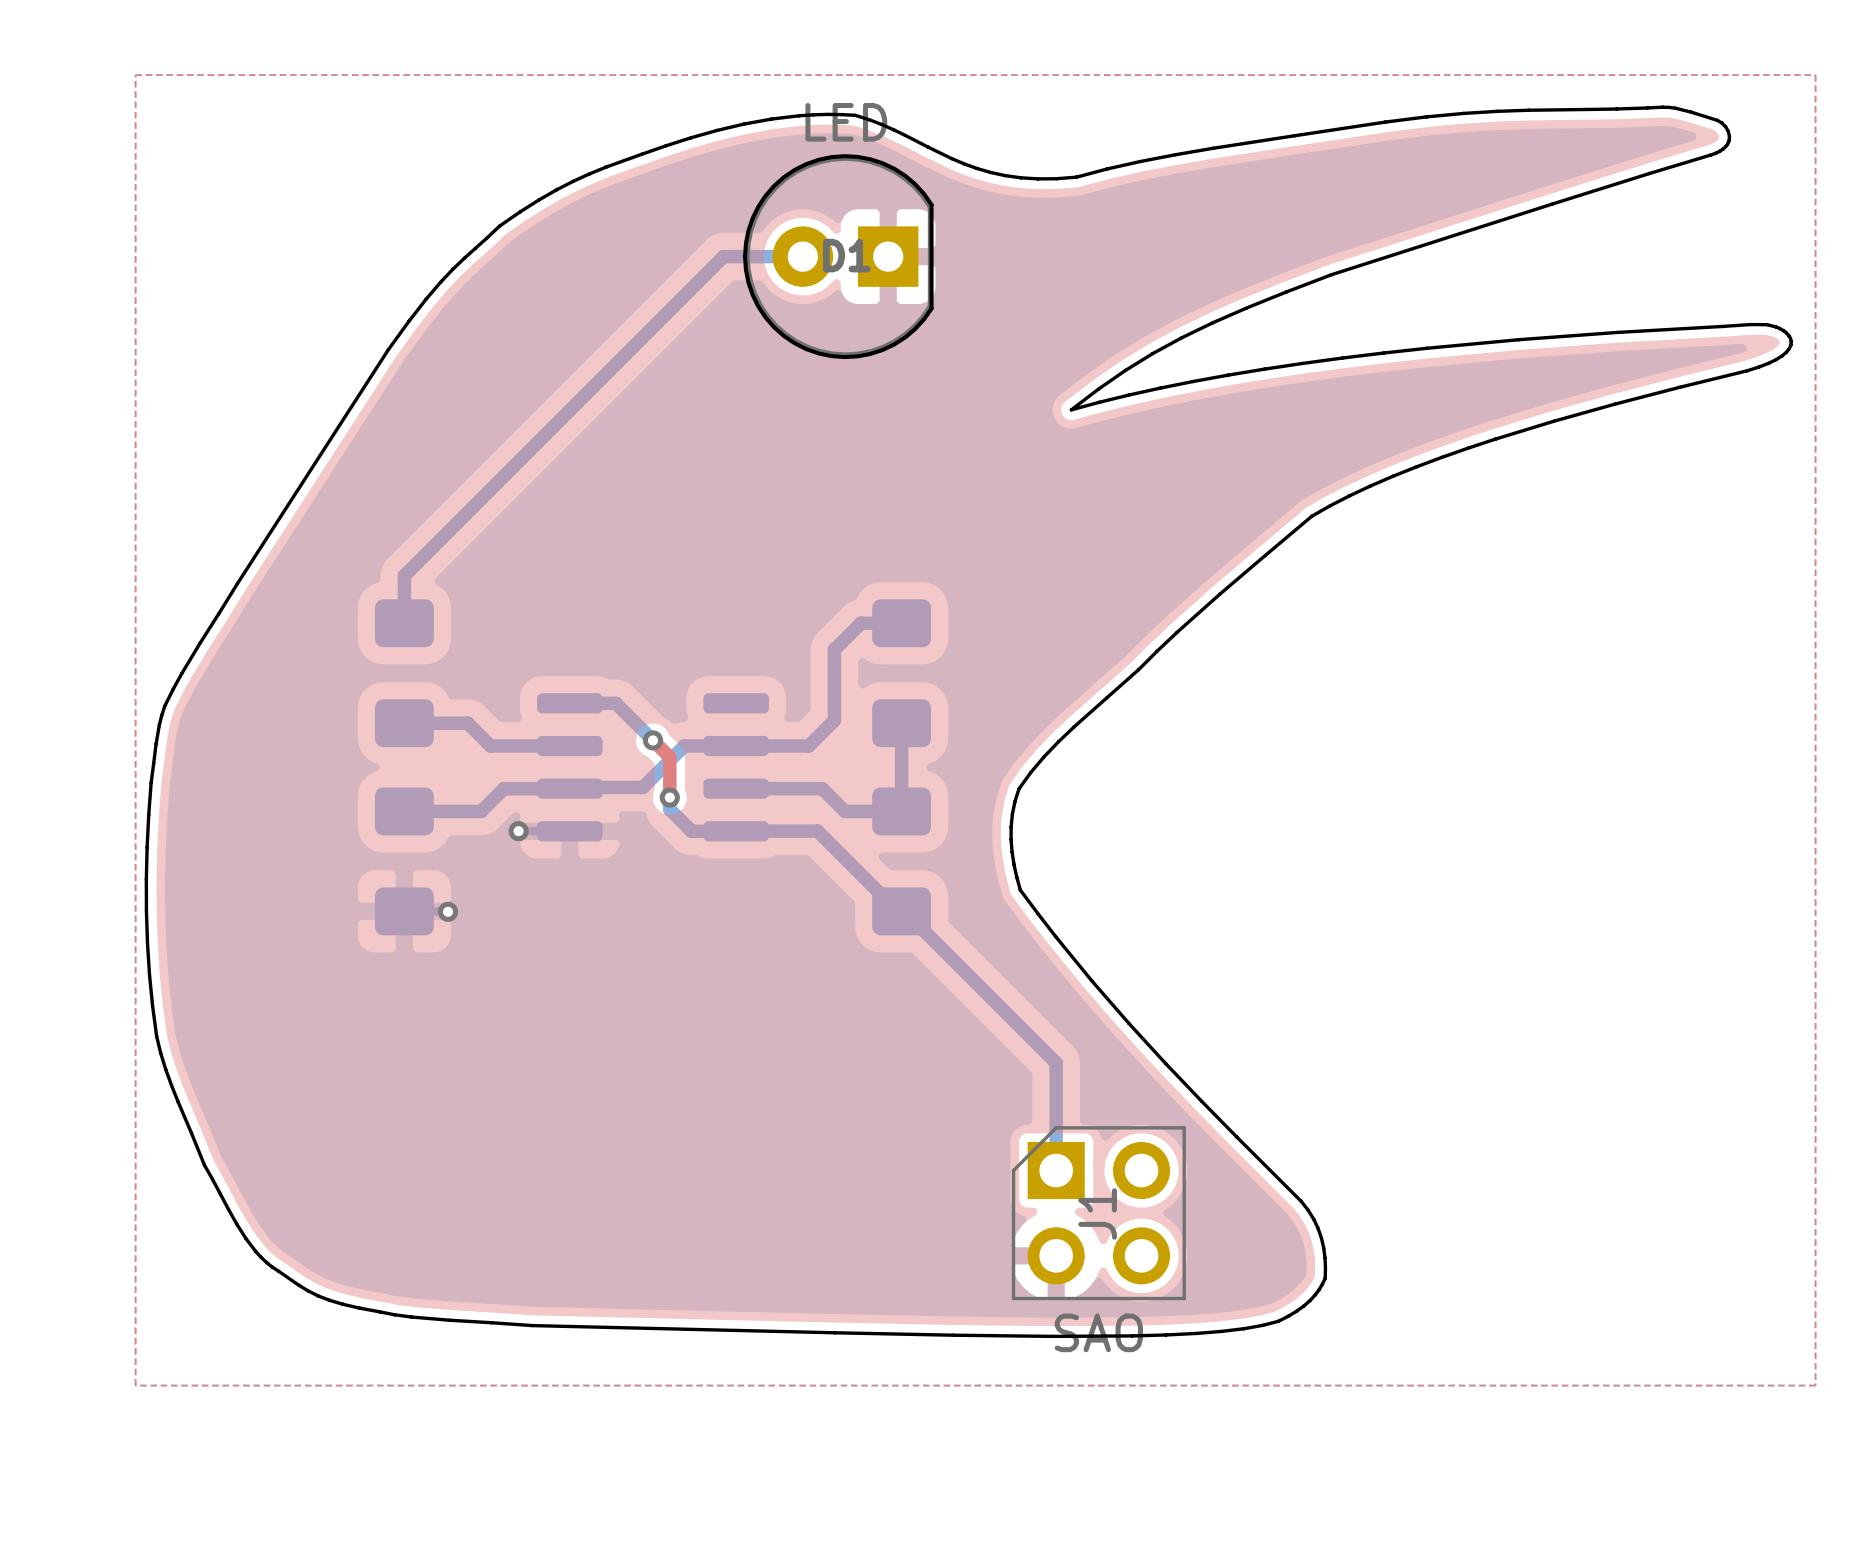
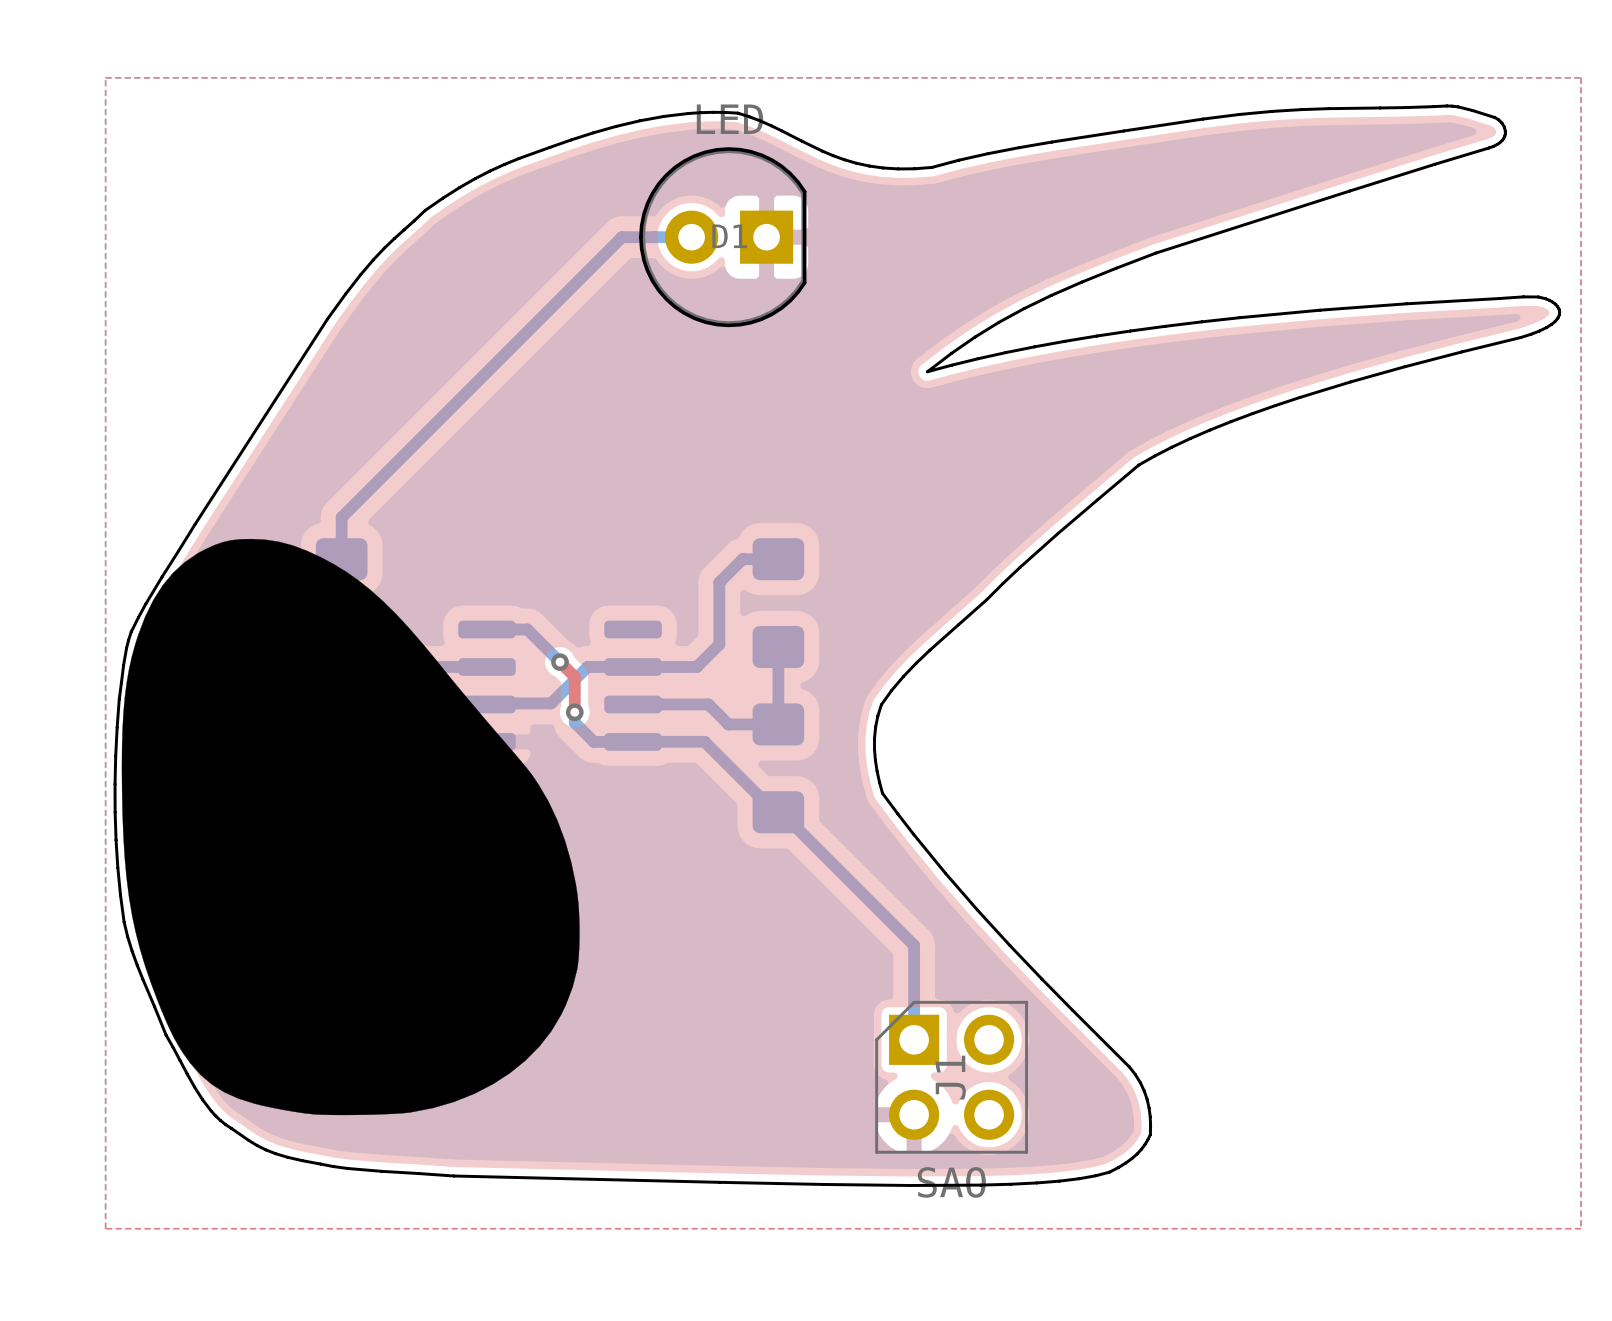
drawing: none -> [121, 538, 580, 1116]

